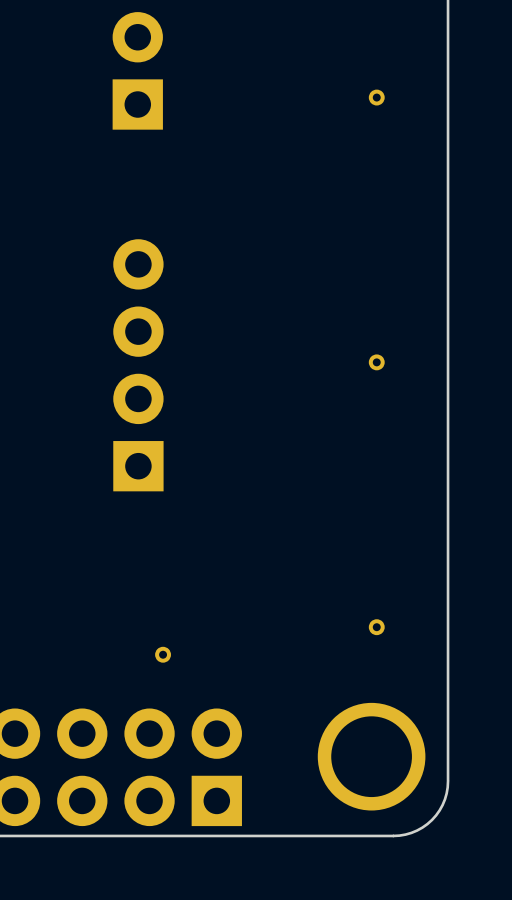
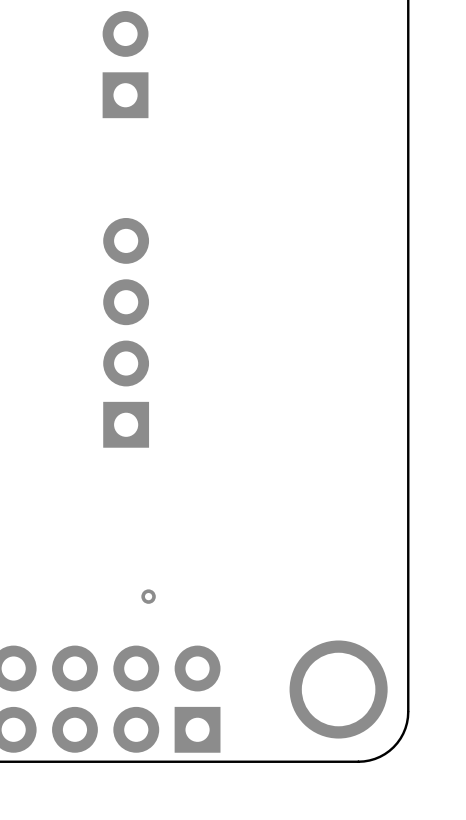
part: (376, 97) -> none
part: (376, 362) -> none
part: (376, 627) -> none

